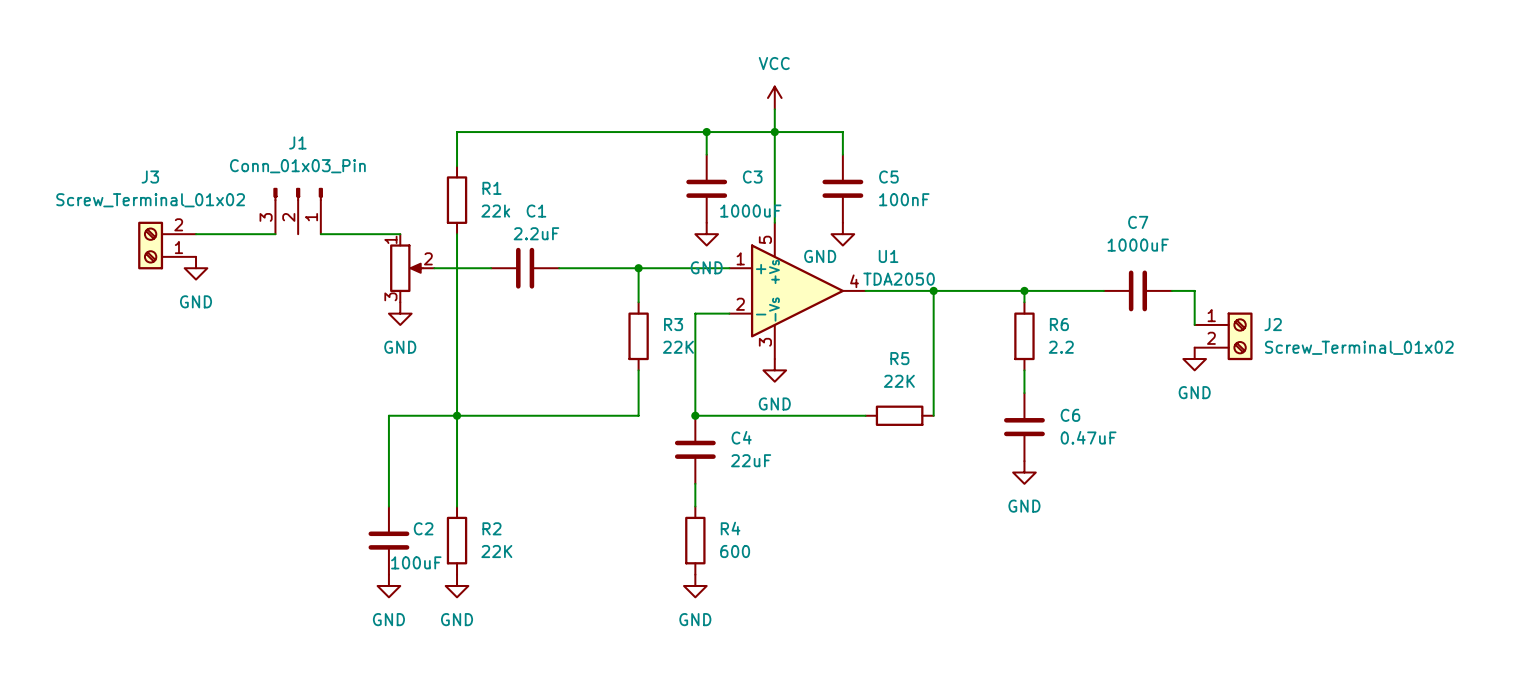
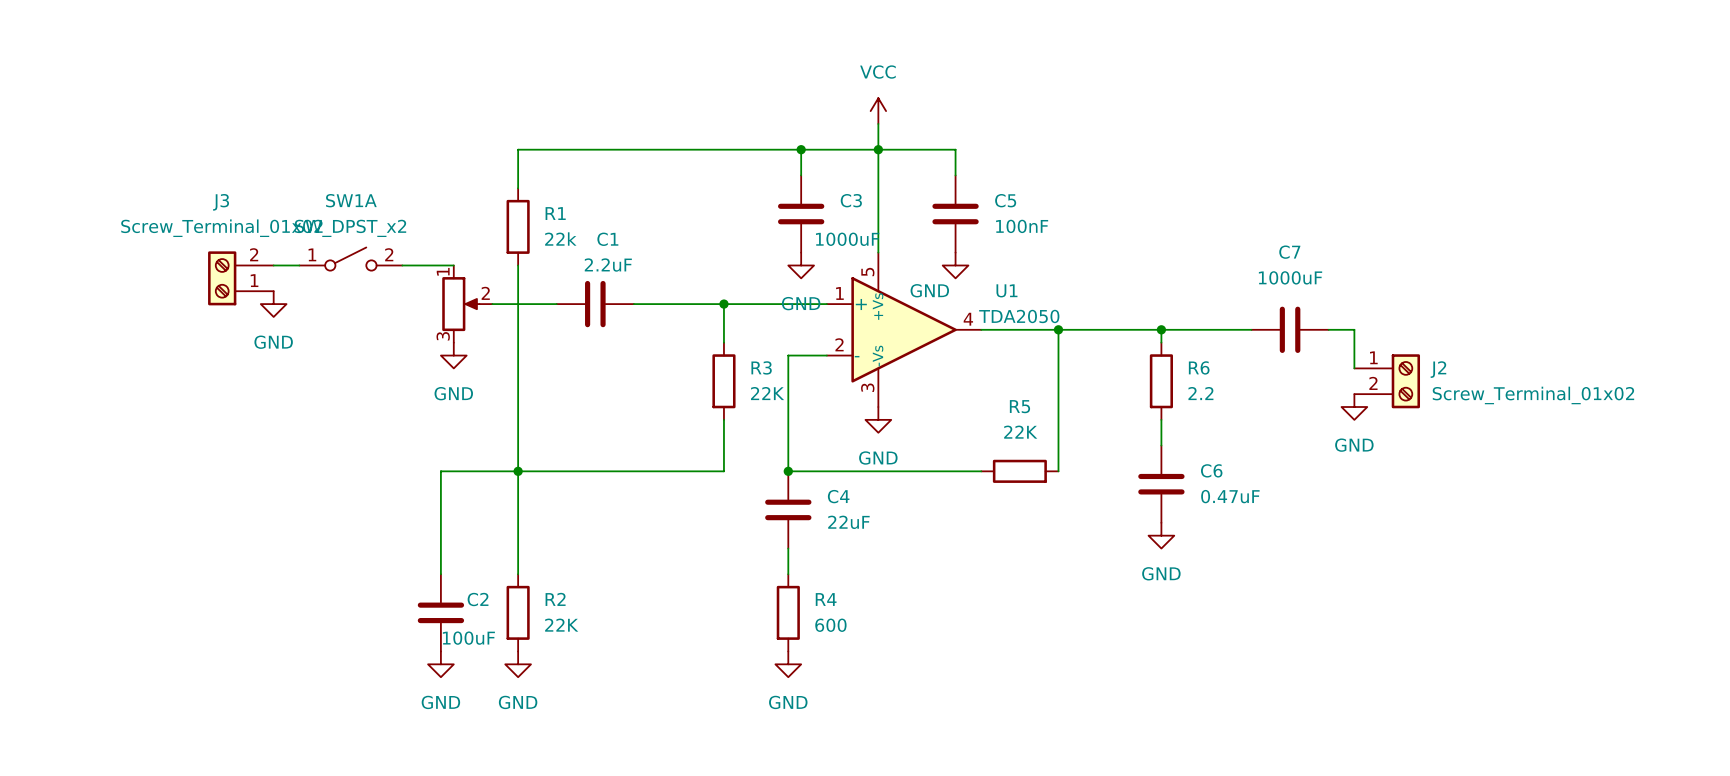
J1: Conn_01x03_Pin (298, 211) -> none
SW1A: none -> SW_DPST_x2 (350, 259)
J3 position: (167, 245) -> (240, 278)
power symbol position: GND (196, 268) -> GND (273, 304)

